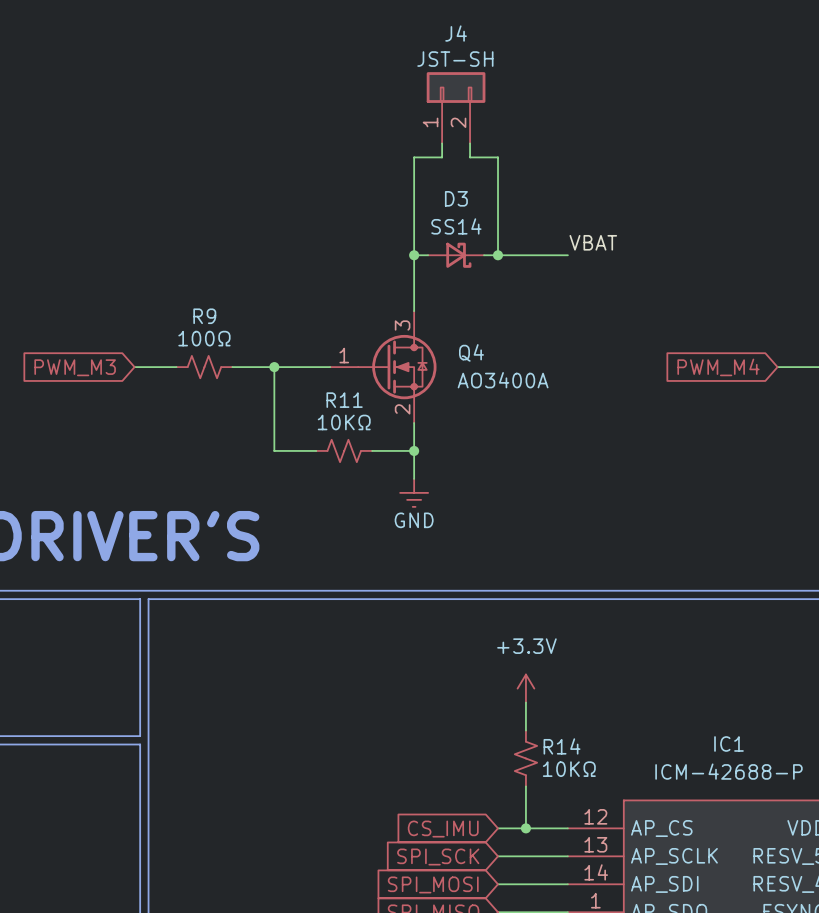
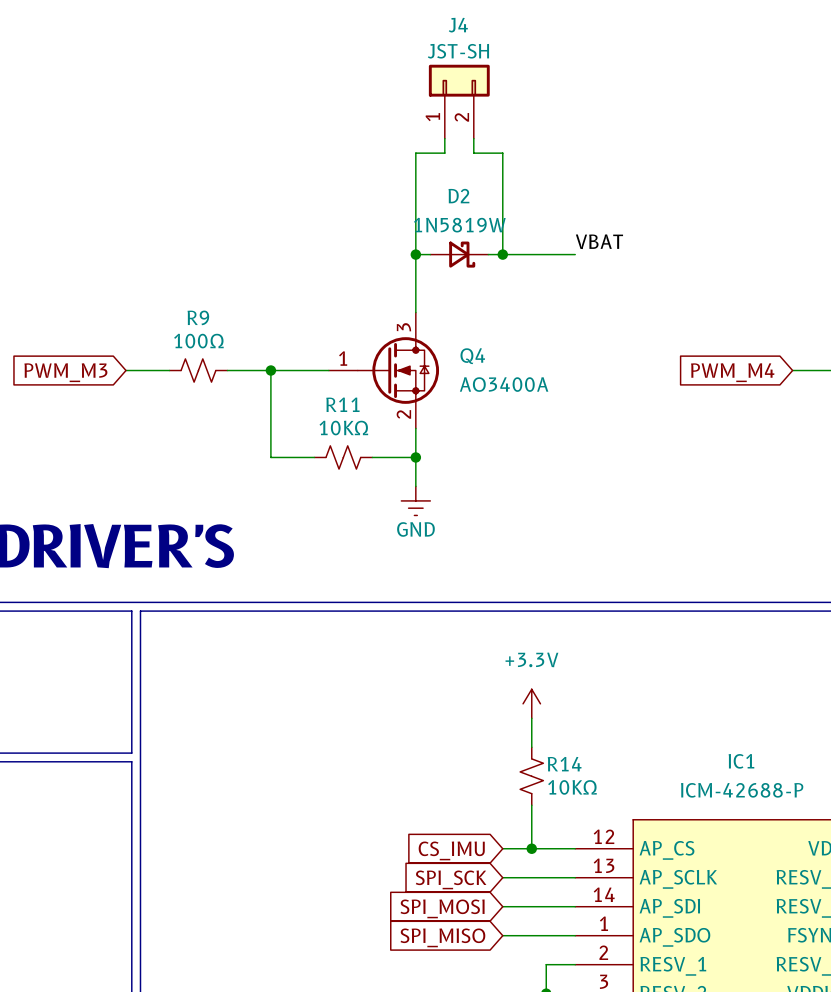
D3 name: D3 (456, 198) -> D2 (458, 196)
D3 value: SS14 (456, 226) -> 1N5819W (459, 225)

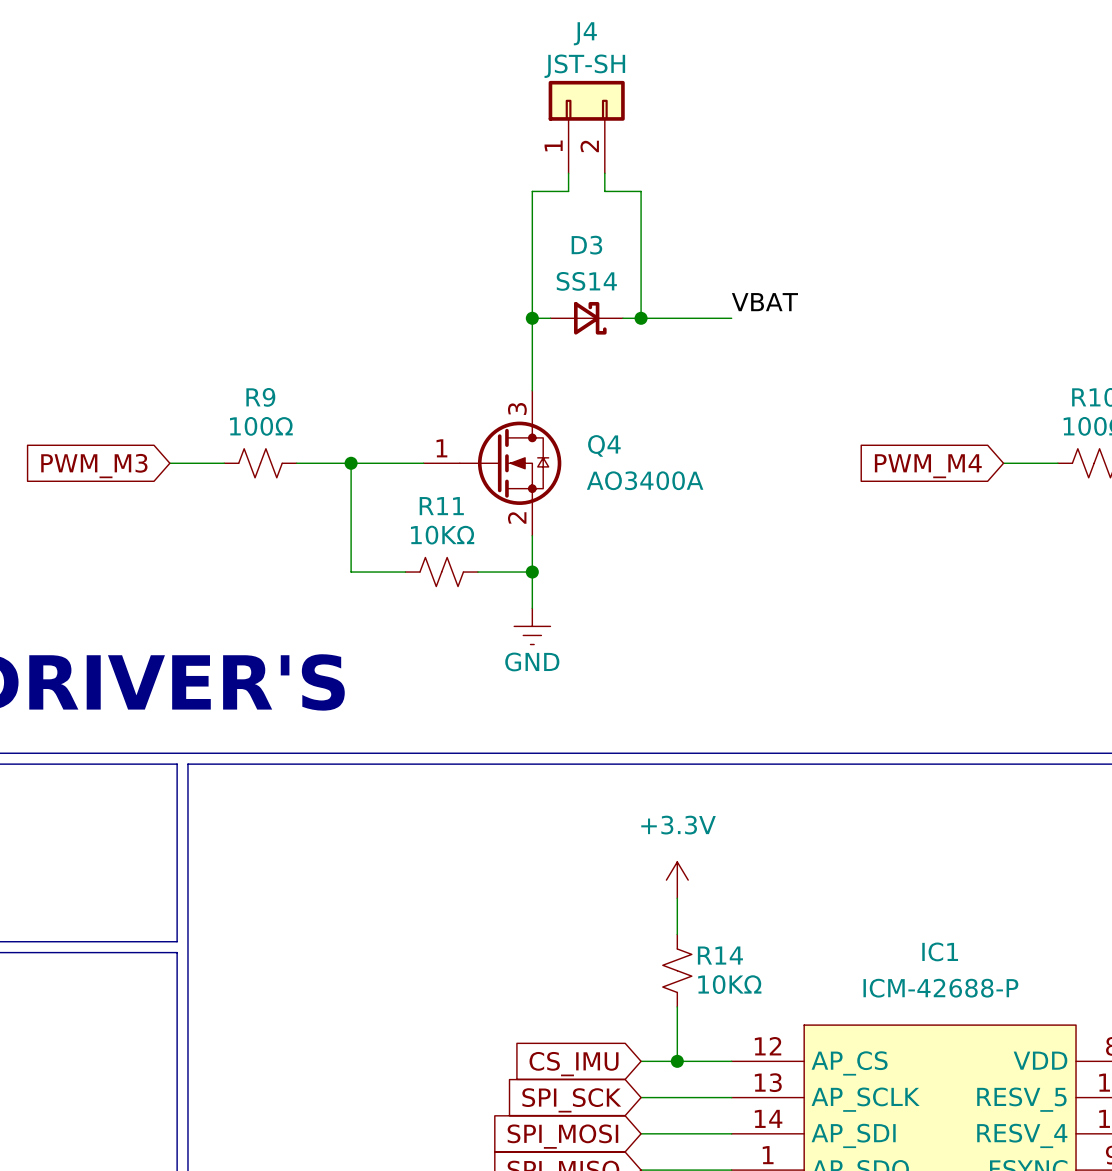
D2 name: D2 (458, 196) -> D3 (586, 245)
D2 value: 1N5819W (459, 225) -> SS14 (586, 281)

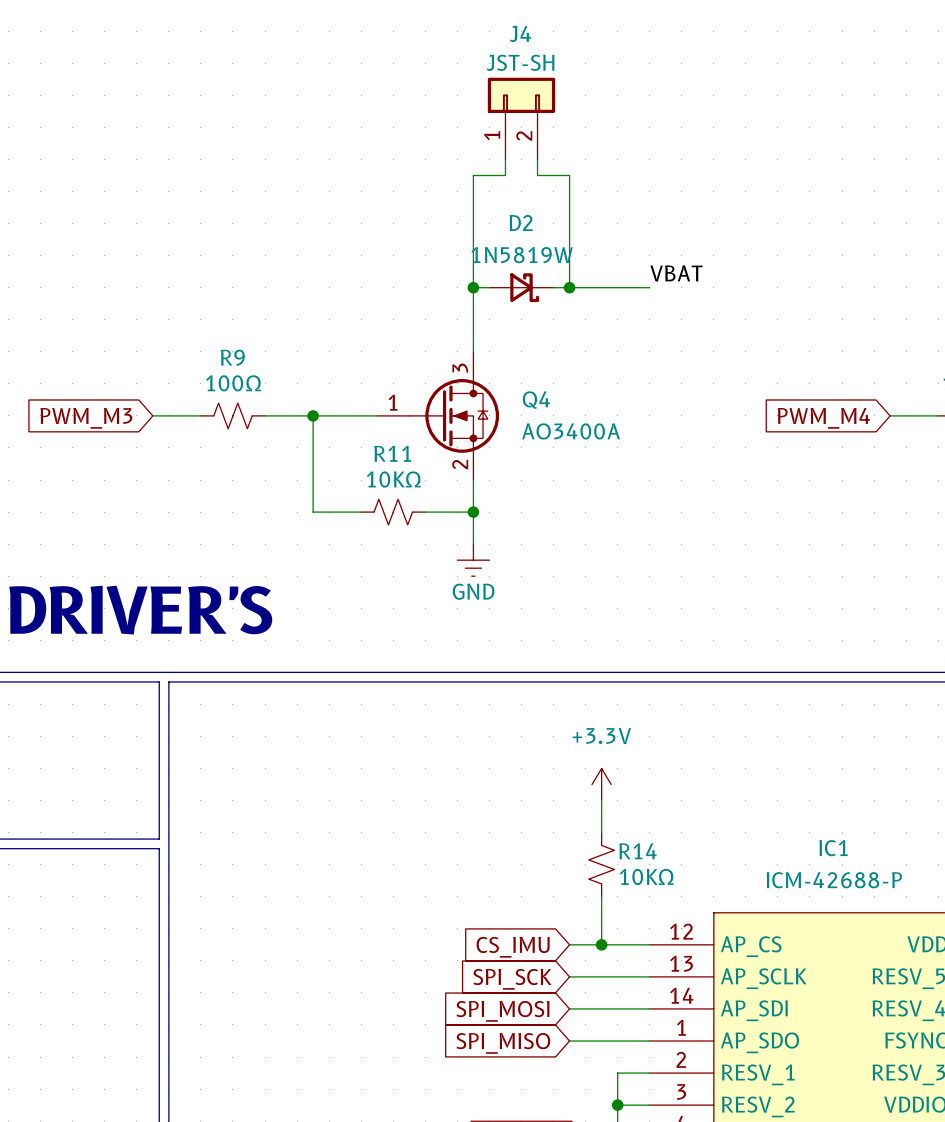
D3 name: D3 (586, 245) -> D2 (521, 223)
D3 value: SS14 (586, 281) -> 1N5819W (522, 255)

